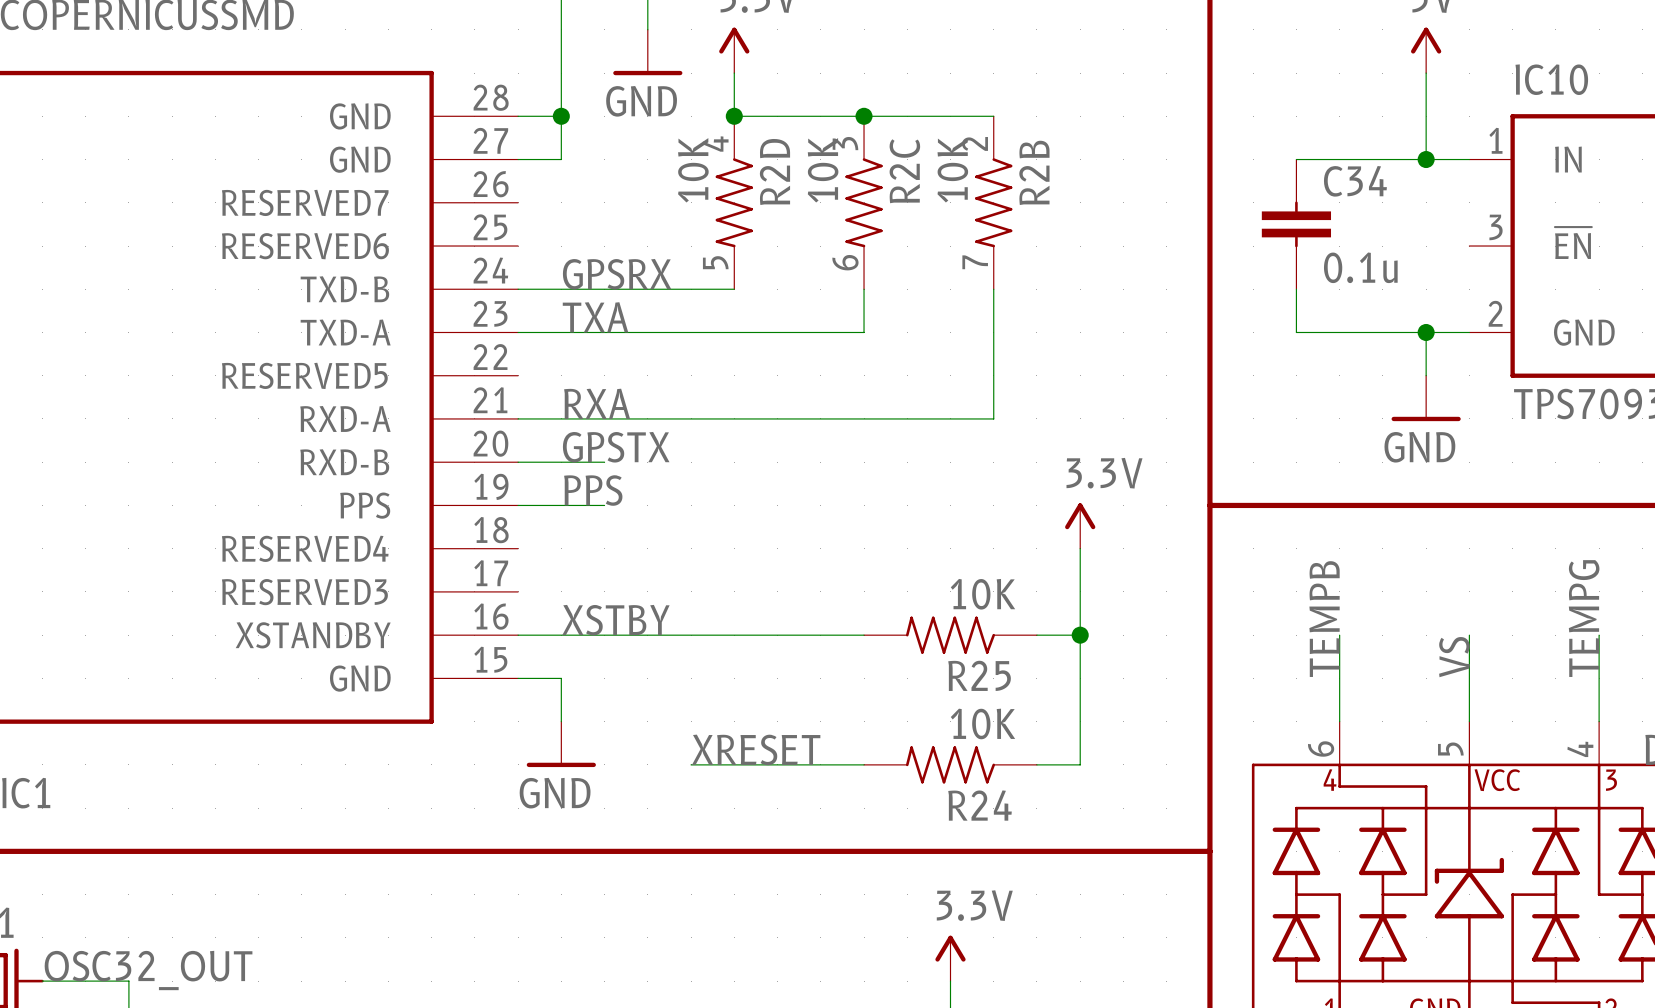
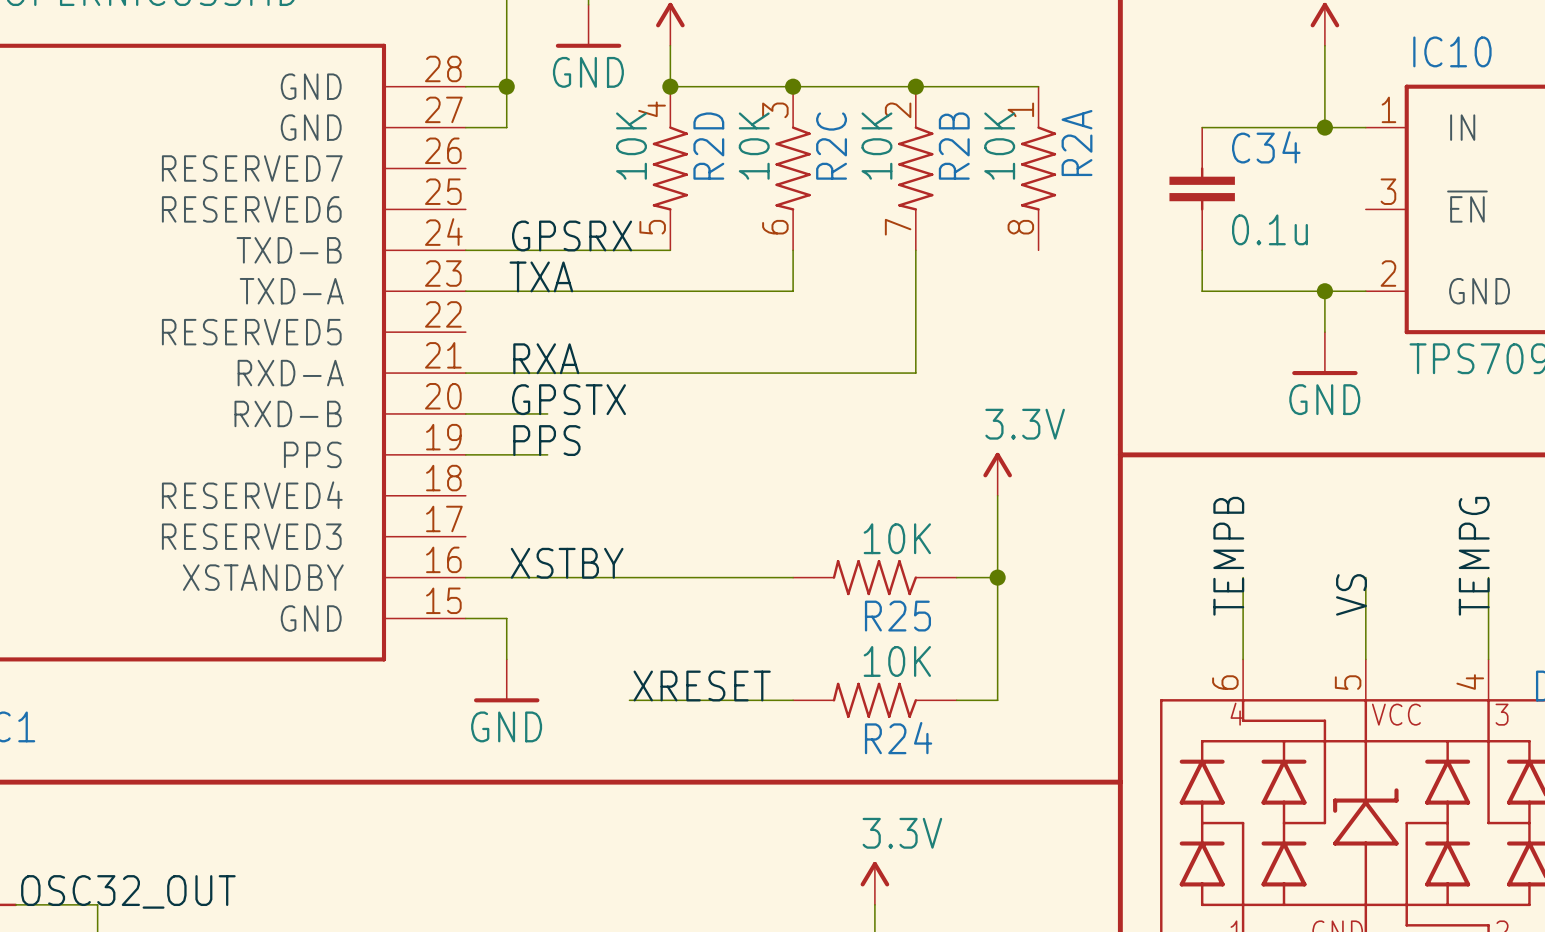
wire: none -> (915, 86) (1038, 86)
junction: none -> (915, 86)
R2A: none -> 10K (1038, 168)

